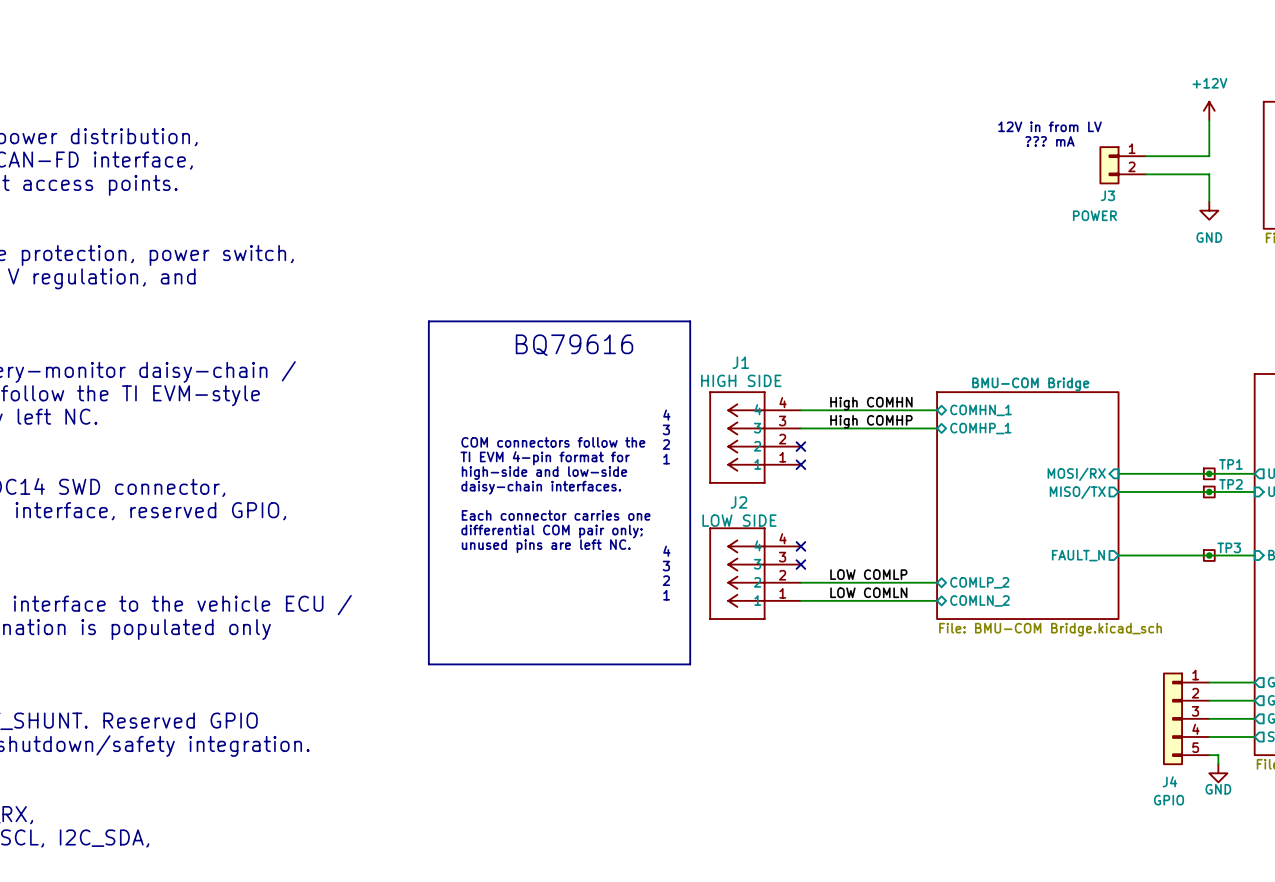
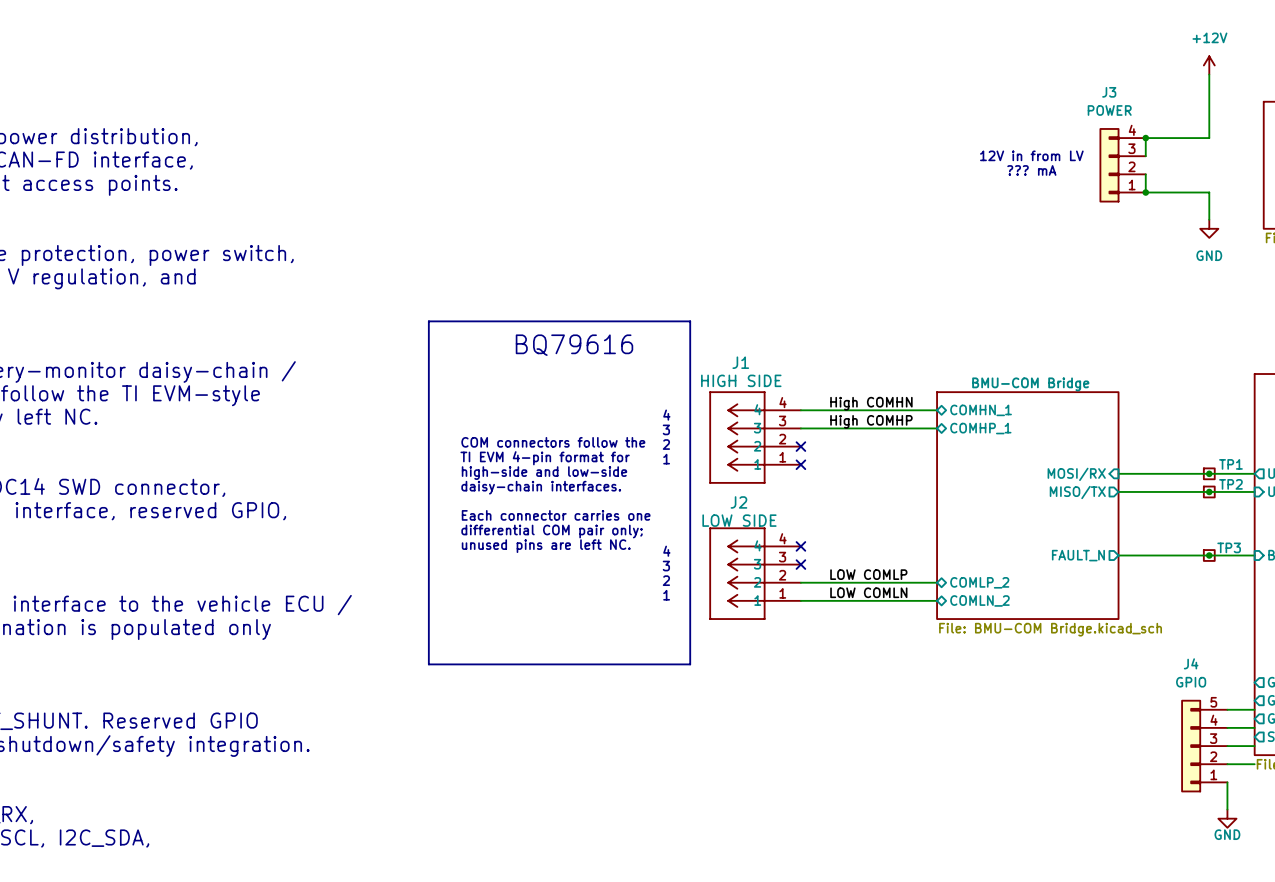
wire: none -> (1209, 74) (1209, 119)
power symbol position: +12V (1209, 110) -> +12V (1209, 65)
text position: 12V in from LV (1050, 126) -> 12V in from LV (1031, 155)
junction: none -> (1145, 138)
wire: (1209, 138) (1209, 156) (1145, 156) -> (1209, 138) (1145, 138) (1145, 156)
text position: ??? mA (1050, 141) -> ??? mA (1031, 170)
J3 symbol: [1099, 146, 1146, 185] -> [1099, 128, 1146, 203]
wire: (1145, 174) (1209, 174) (1209, 192) -> (1145, 174) (1145, 192) (1209, 192)
junction: none -> (1145, 192)
J3 name position: J3 (1108, 195) -> J3 (1109, 92)
power symbol position: GND (1209, 210) -> GND (1209, 228)
J3 value position: POWER (1094, 215) -> POWER (1109, 110)
wire: (1209, 682) (1254, 682) -> none
wire: (1209, 700) (1254, 700) -> none
wire: none -> (1227, 709) (1254, 709)
J4 flip: as is (1172, 718) -> up-down (1191, 746)
wire: (1209, 718) (1254, 718) -> none
wire: none -> (1227, 727) (1254, 727)
wire: (1209, 737) (1254, 737) -> none
wire: none -> (1227, 746) (1254, 746)
wire: (1209, 755) (1218, 755) (1218, 764) -> none
wire: none -> (1227, 764) (1254, 764)
power symbol position: GND (1218, 773) -> GND (1227, 818)
J4 name position: J4 (1169, 781) -> J4 (1191, 663)
wire: none -> (1227, 782) (1227, 809)
J4 value position: GPIO (1168, 800) -> GPIO (1191, 682)

